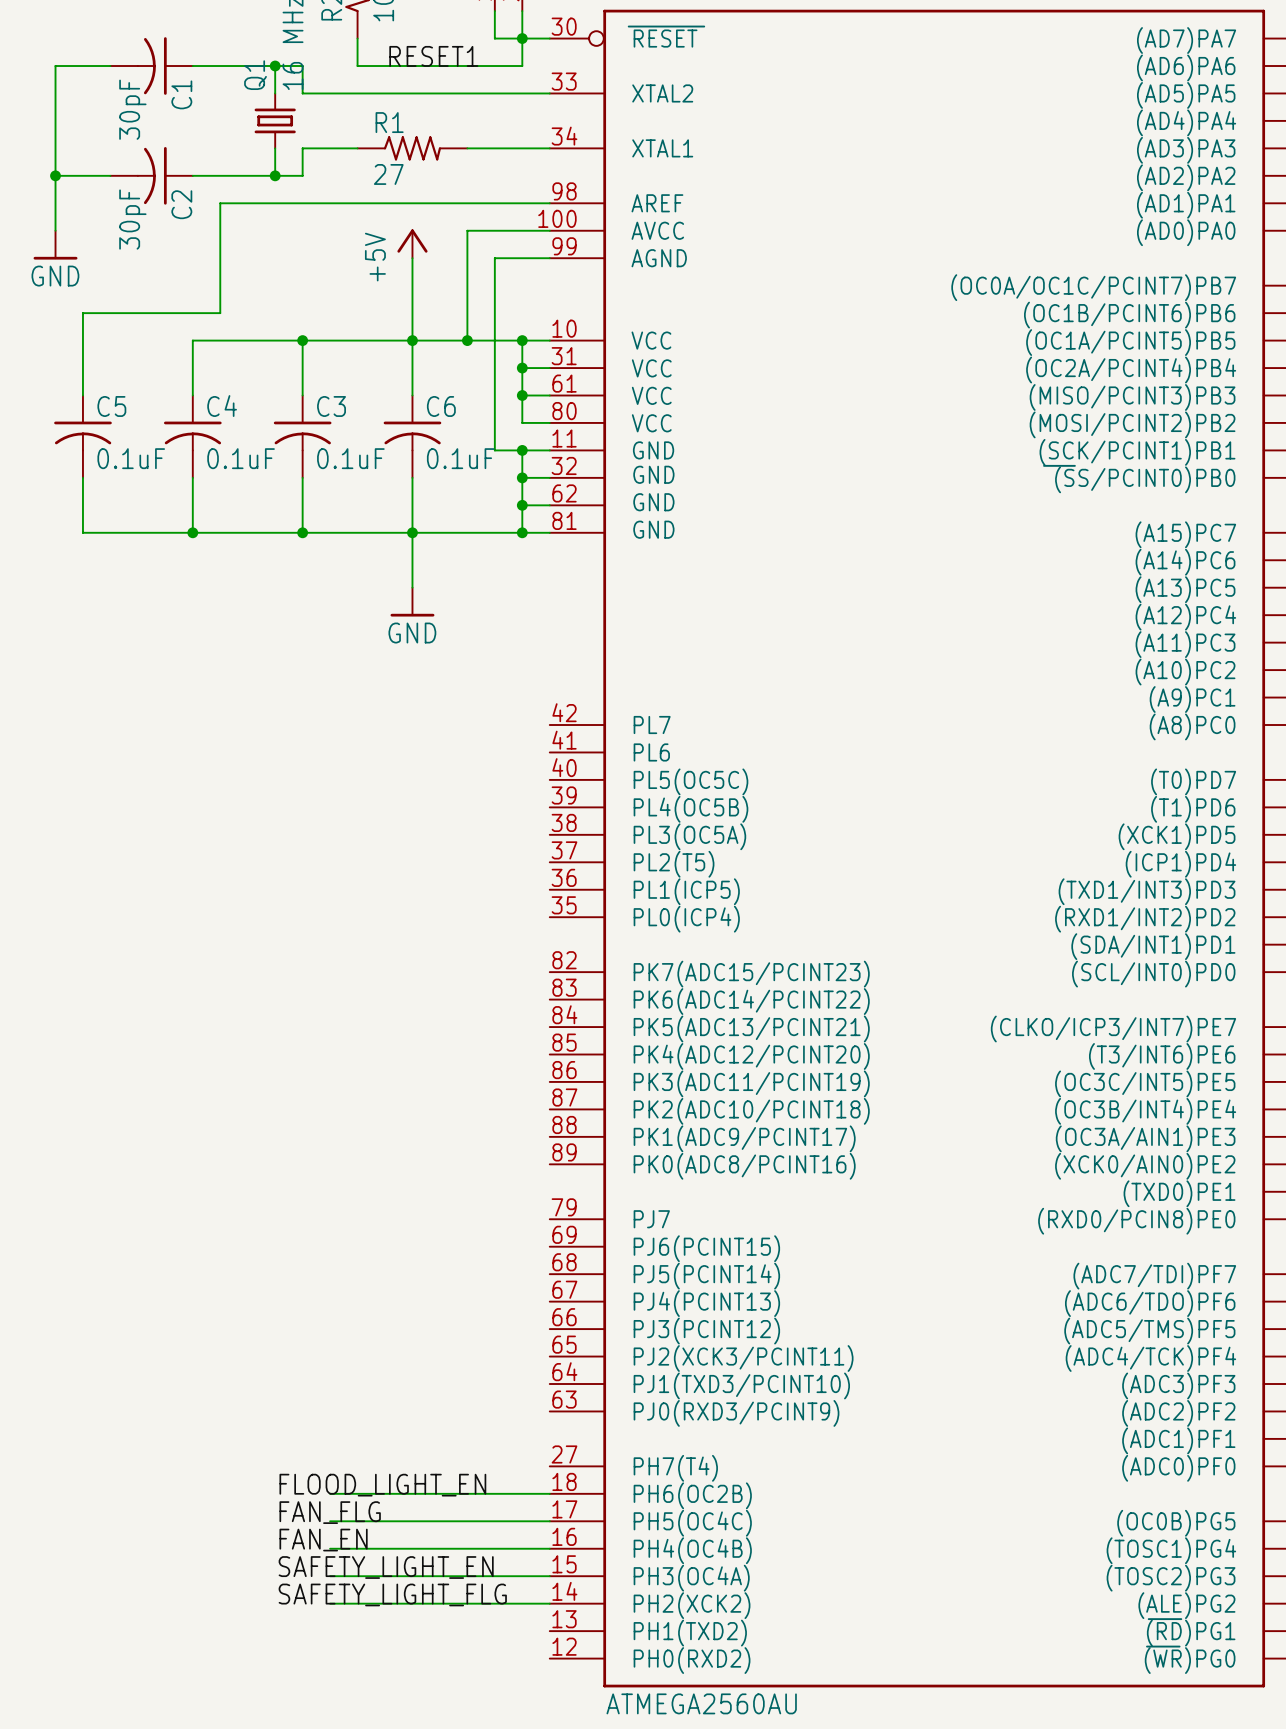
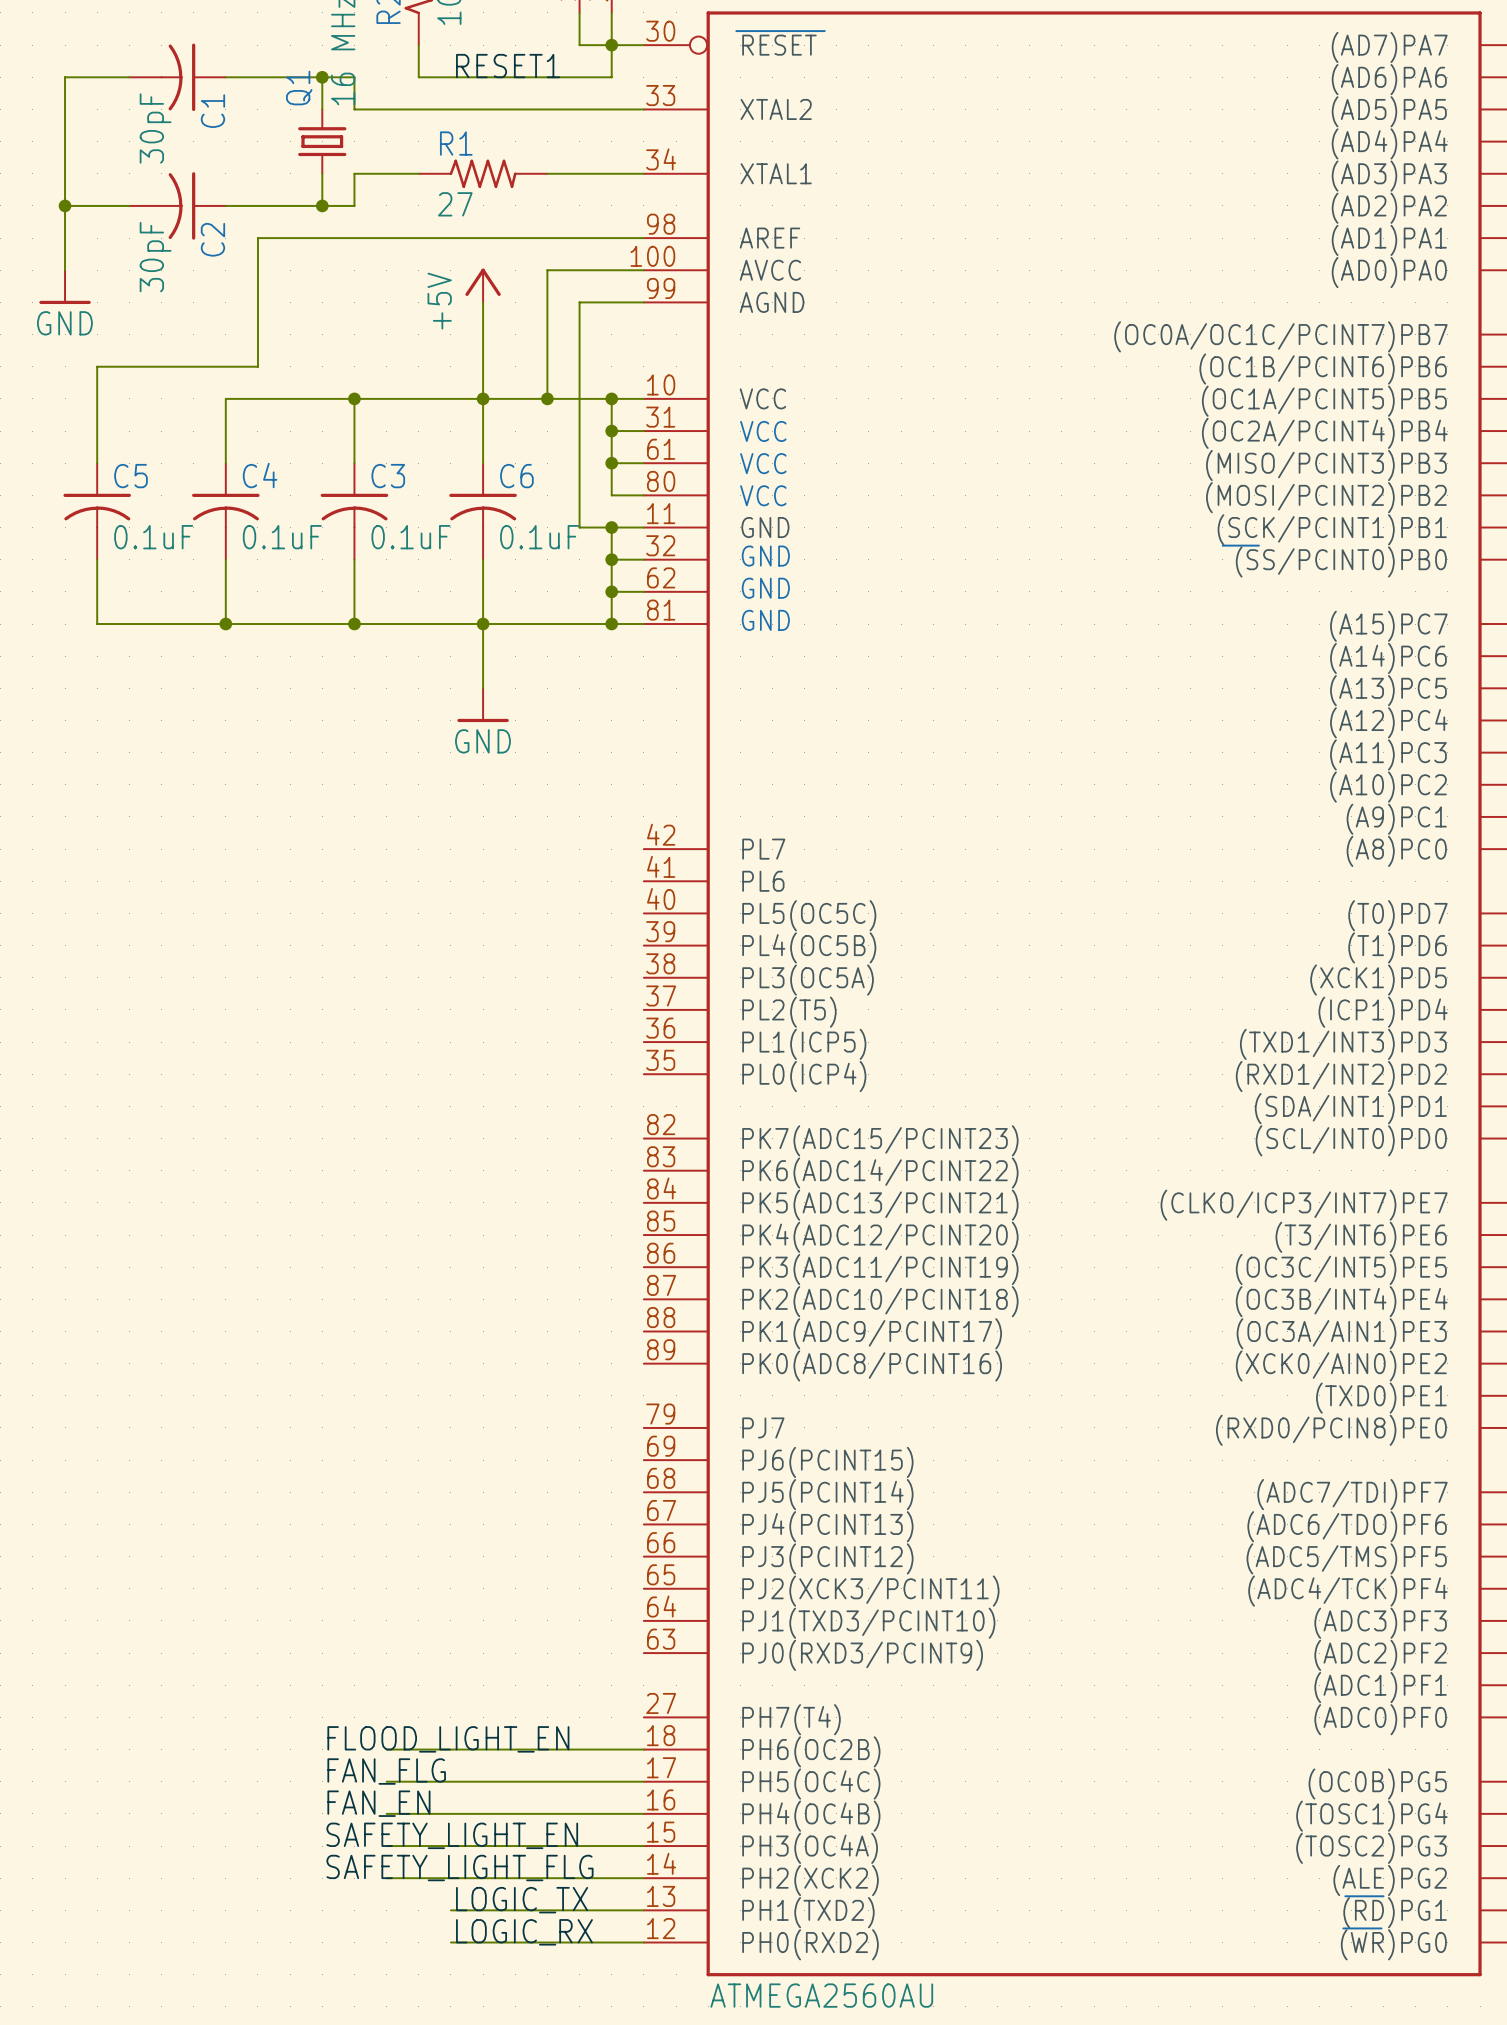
label: none -> LOGIC_TX (522, 1900)
wire: none -> (450, 1910) (643, 1910)
label: none -> LOGIC_RX (524, 1932)
wire: none -> (450, 1942) (643, 1942)

